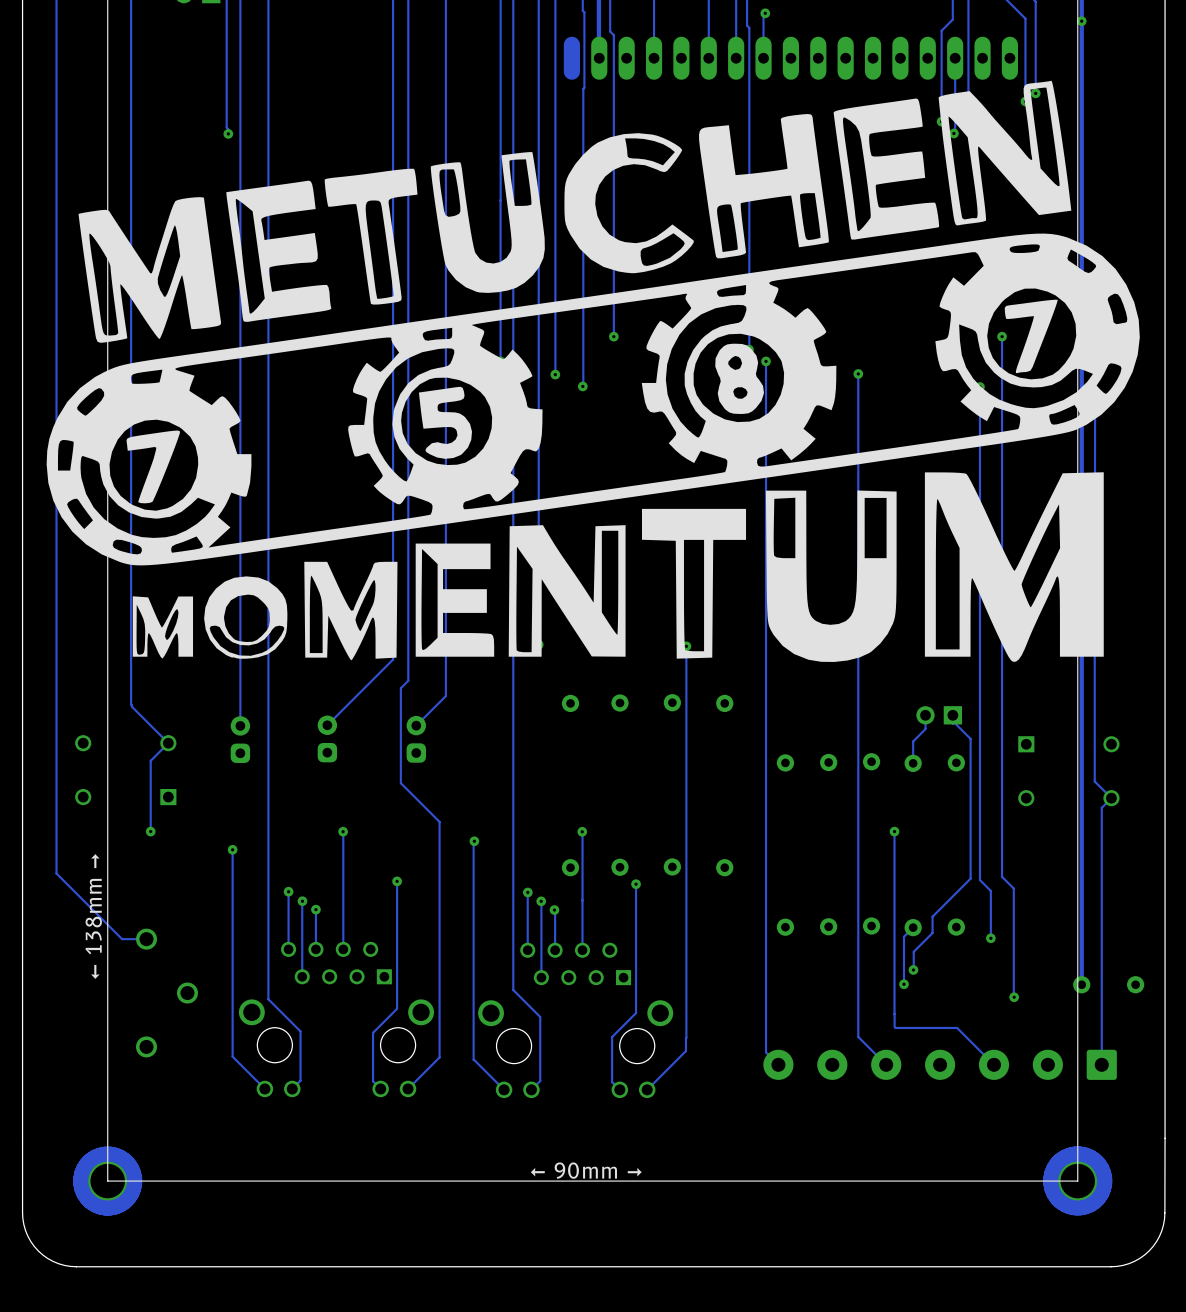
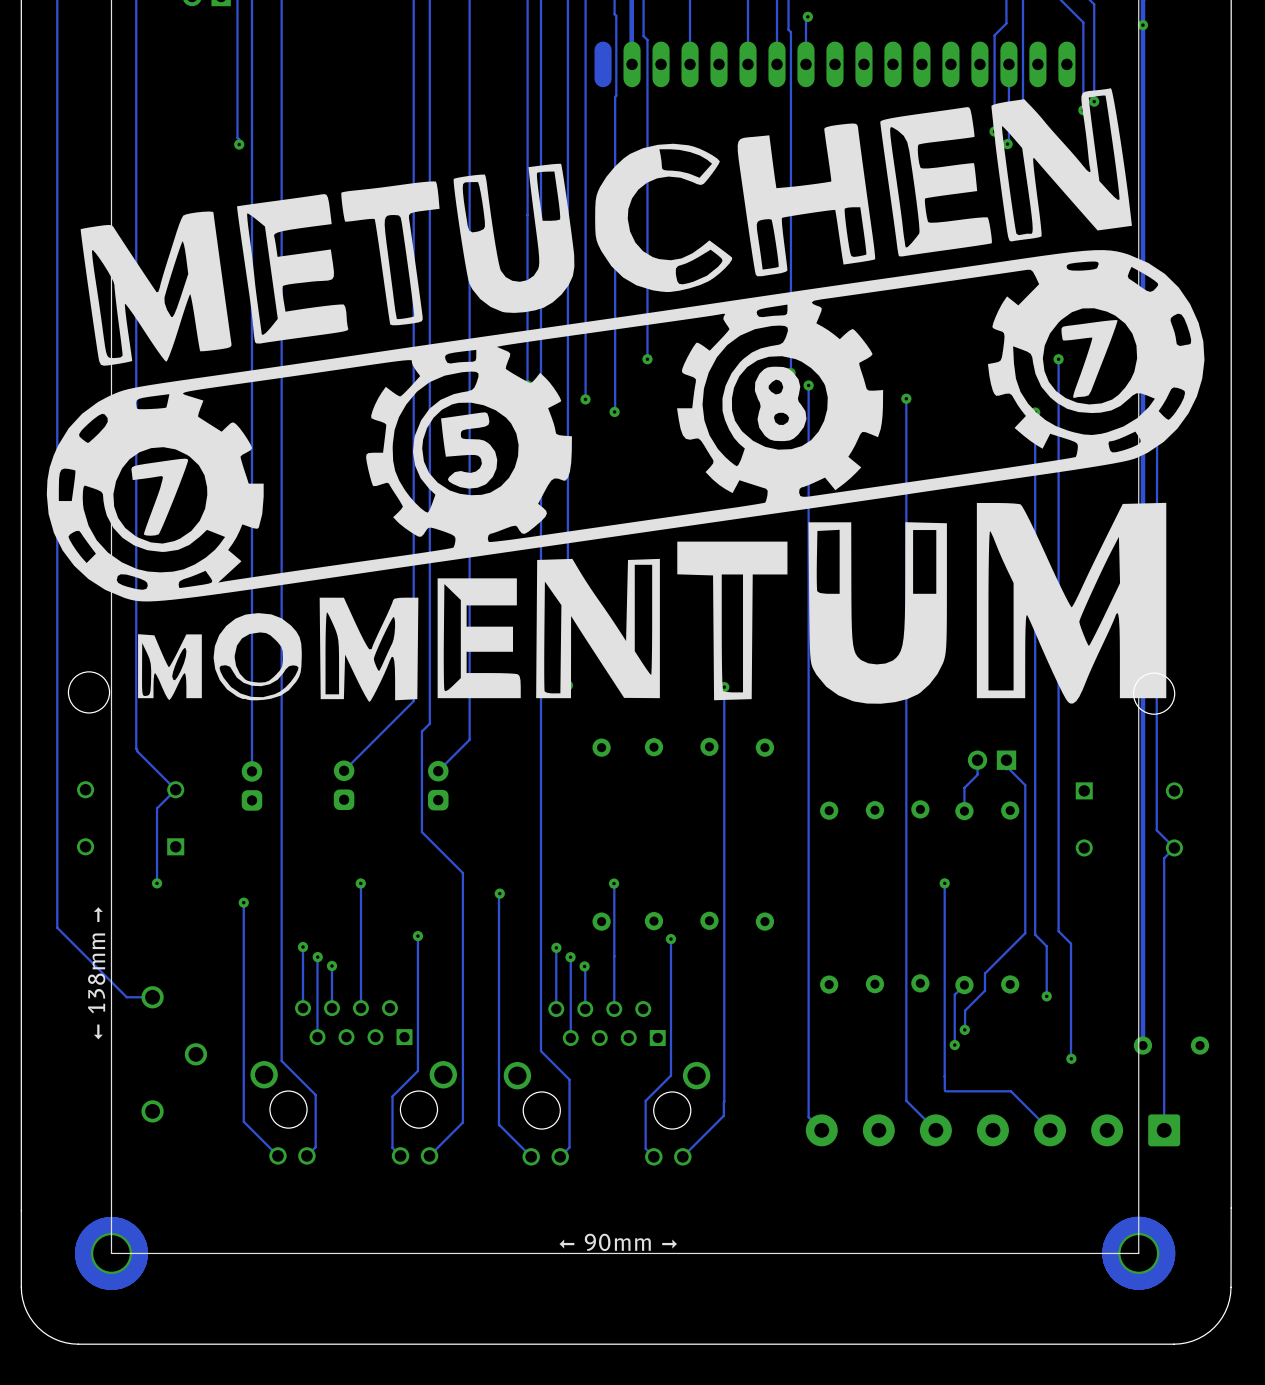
drawing: none -> [68, 671, 110, 714]
drawing: none -> [1133, 672, 1175, 715]

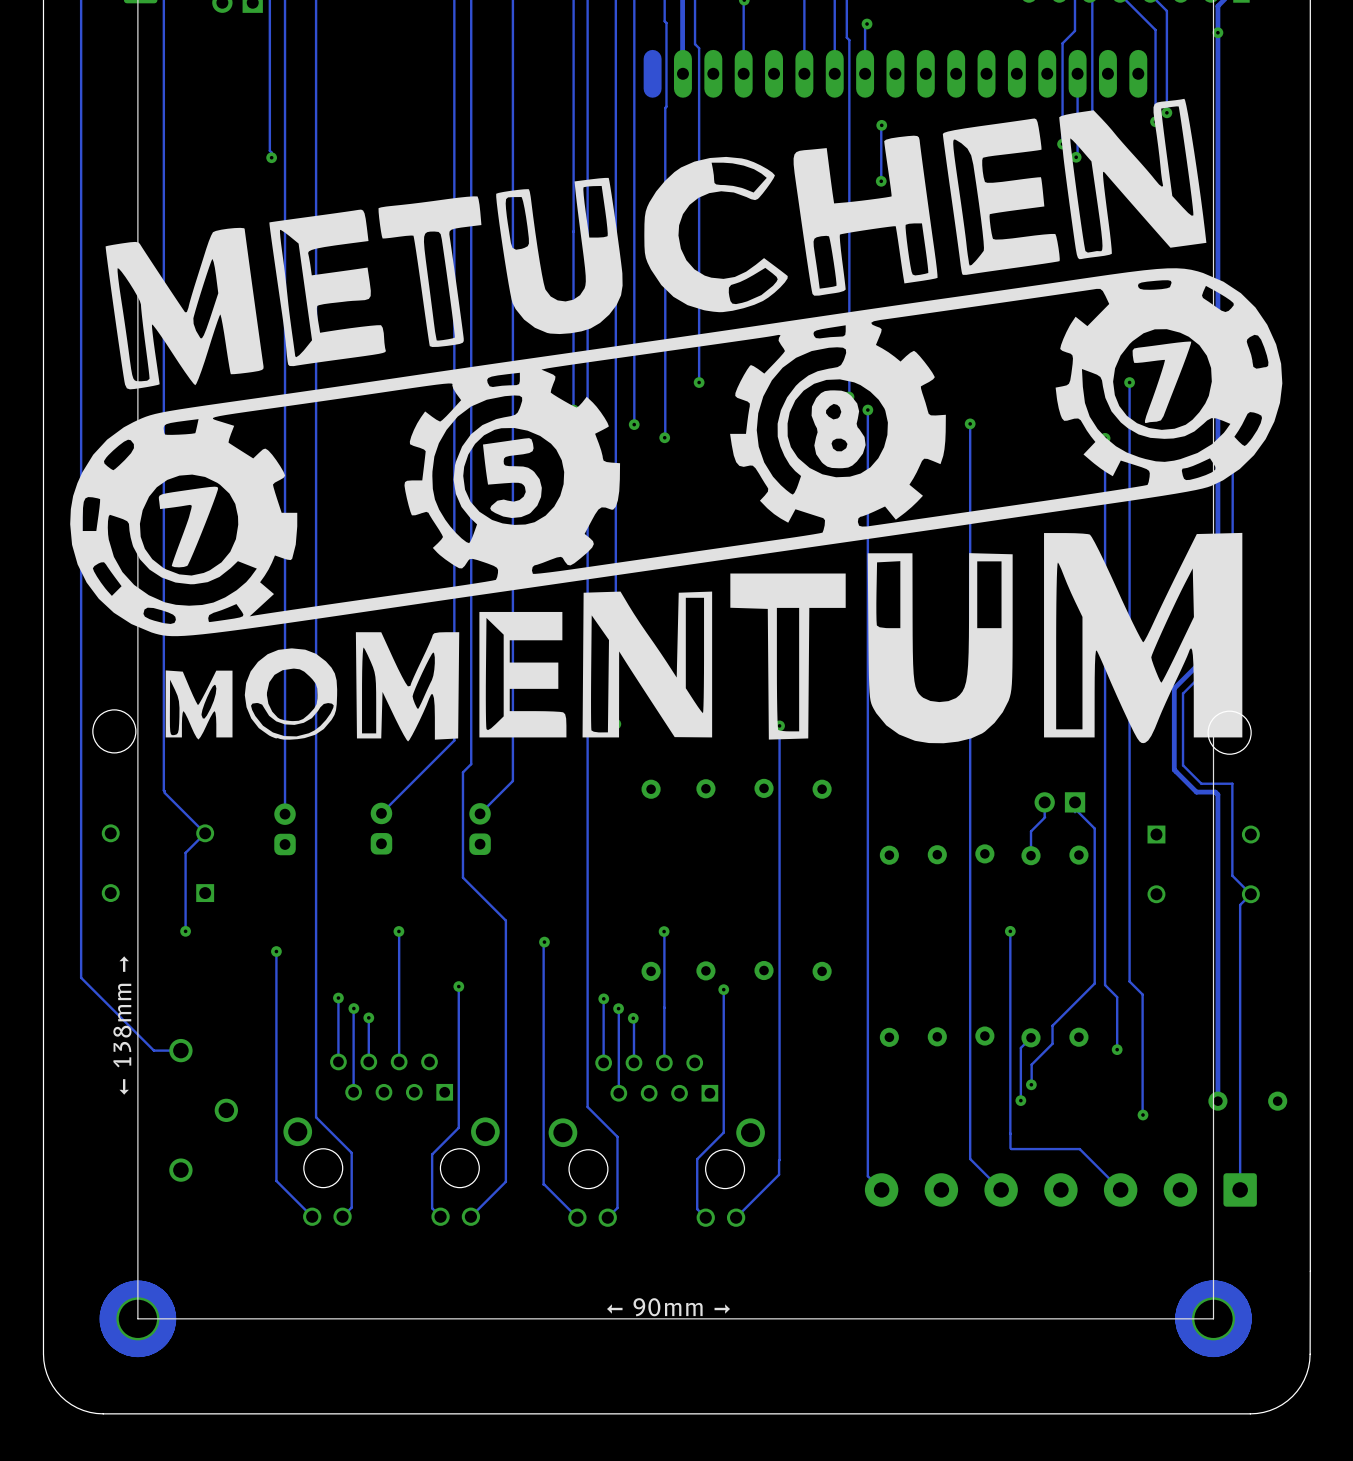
track: none -> (881, 125) (881, 180)
via: none -> (881, 125)
via: none -> (881, 181)
track: (1142, 628) (1142, 752) -> (1217, 664) (1198, 664) (1174, 688) (1174, 769) (1196, 792) (1215, 792) (1217, 794)
track: (1156, 639) (1156, 742) -> (1232, 676) (1200, 676) (1183, 693) (1183, 765) (1201, 783) (1232, 783)

